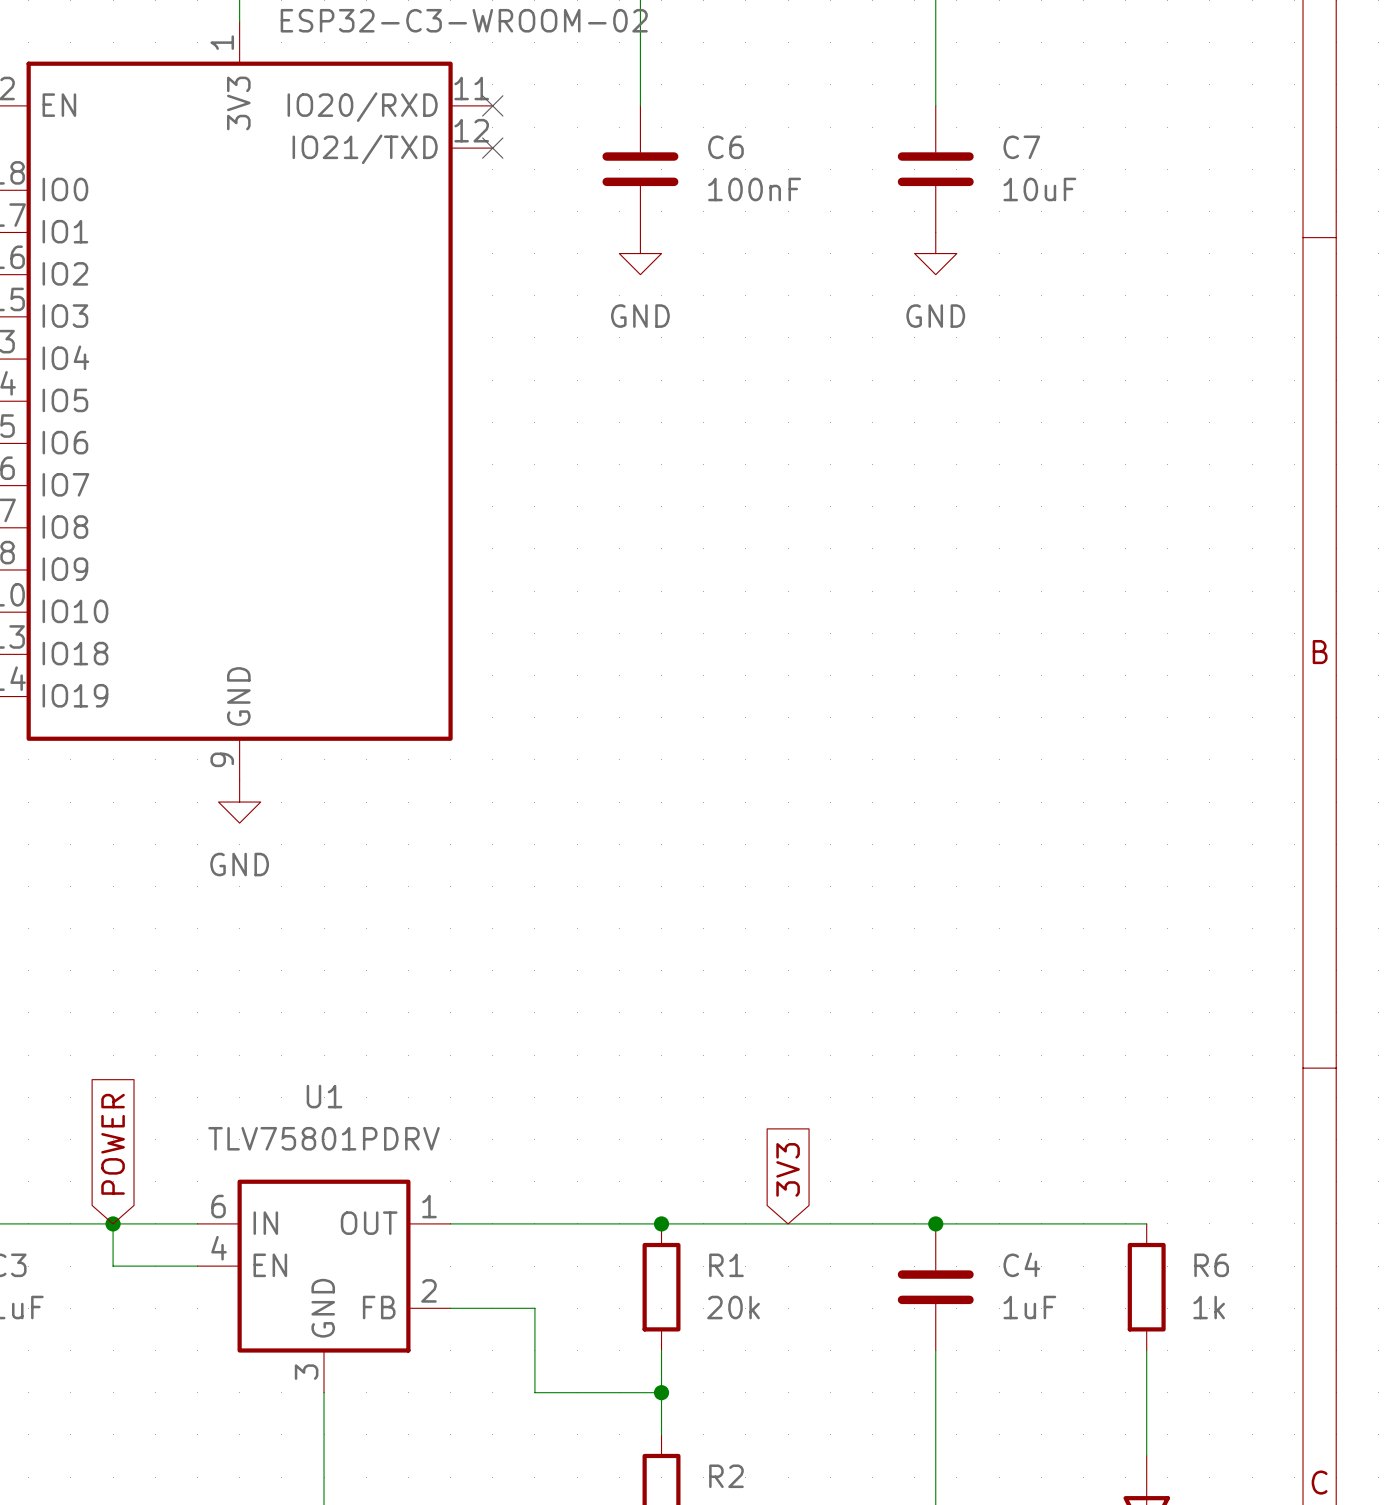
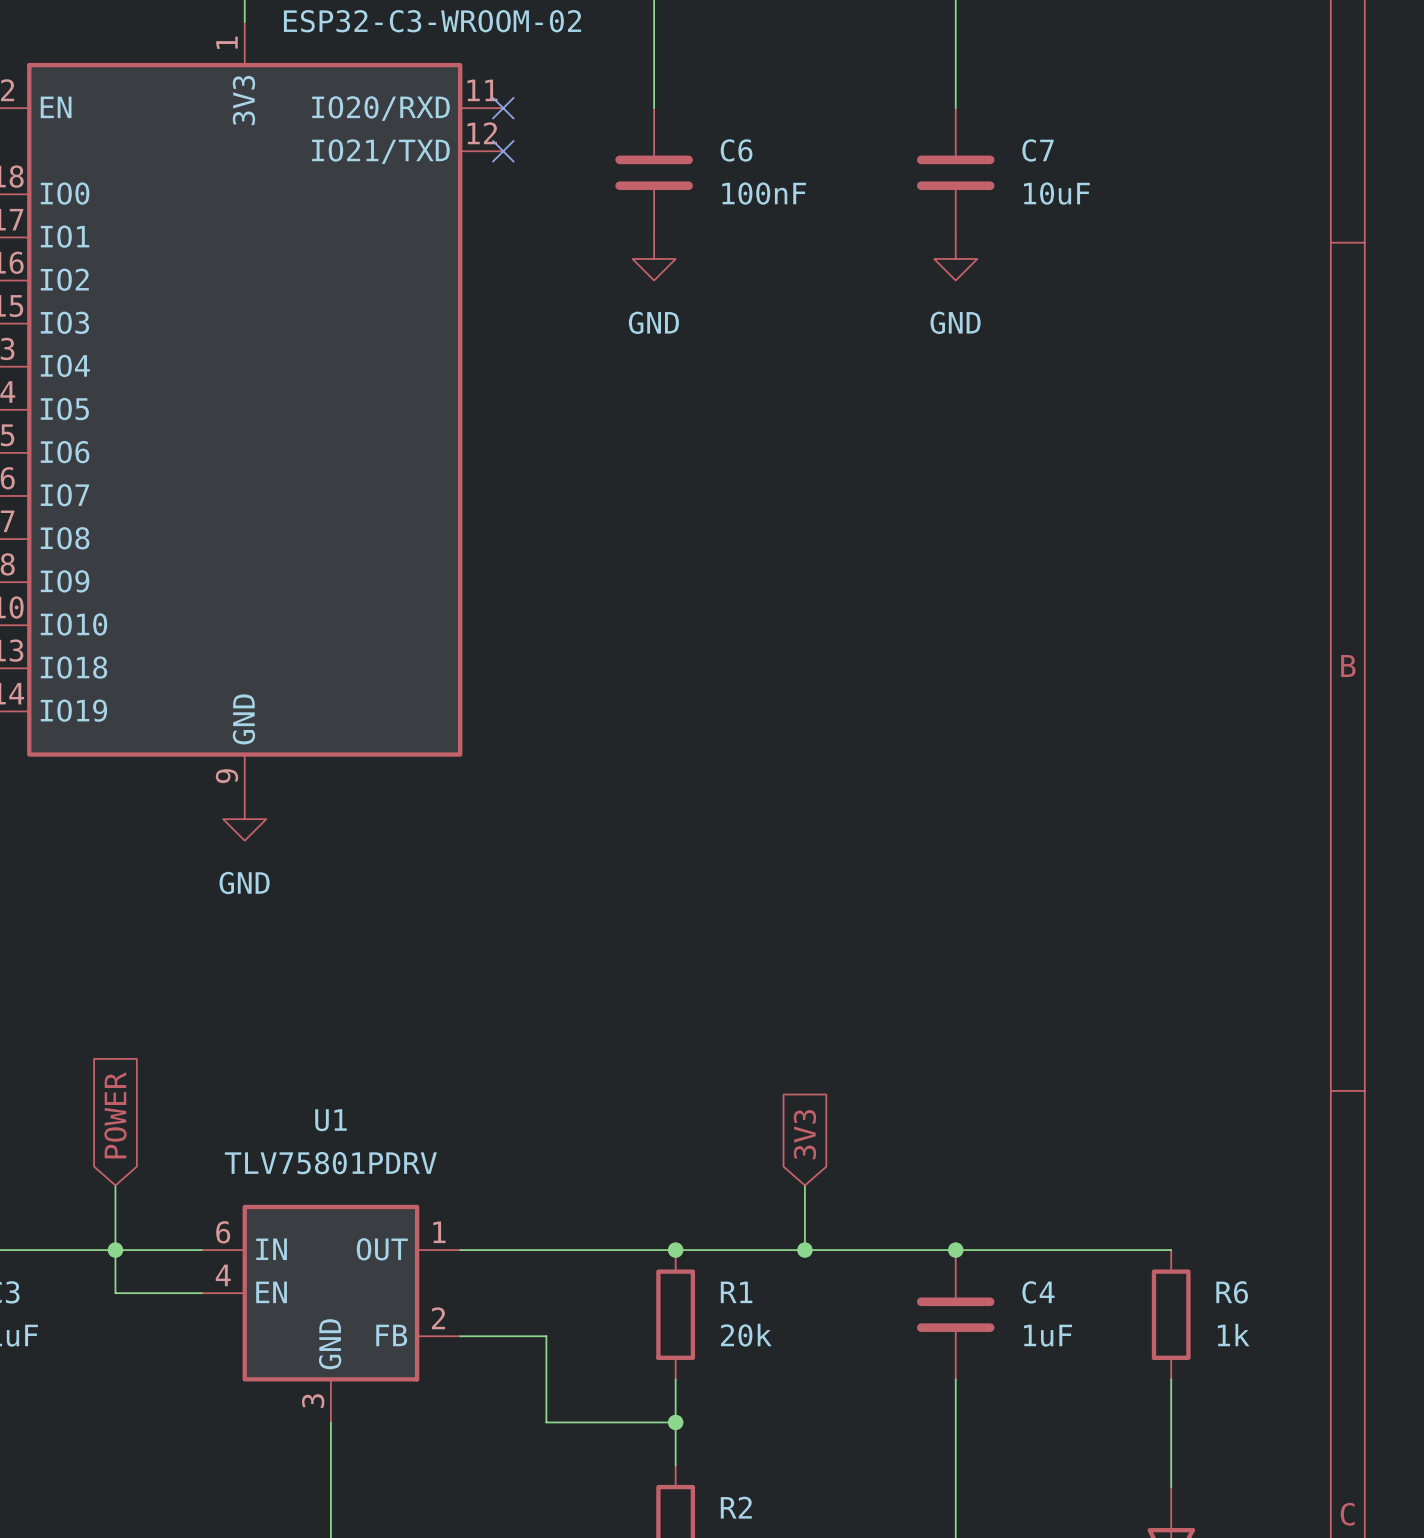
global label position: POWER (113, 1144) -> POWER (115, 1115)
wire: none -> (115, 1185) (115, 1250)
wire: none -> (804, 1185) (804, 1250)
global label position: 3V3 (788, 1169) -> 3V3 (804, 1134)
junction: none -> (804, 1250)

